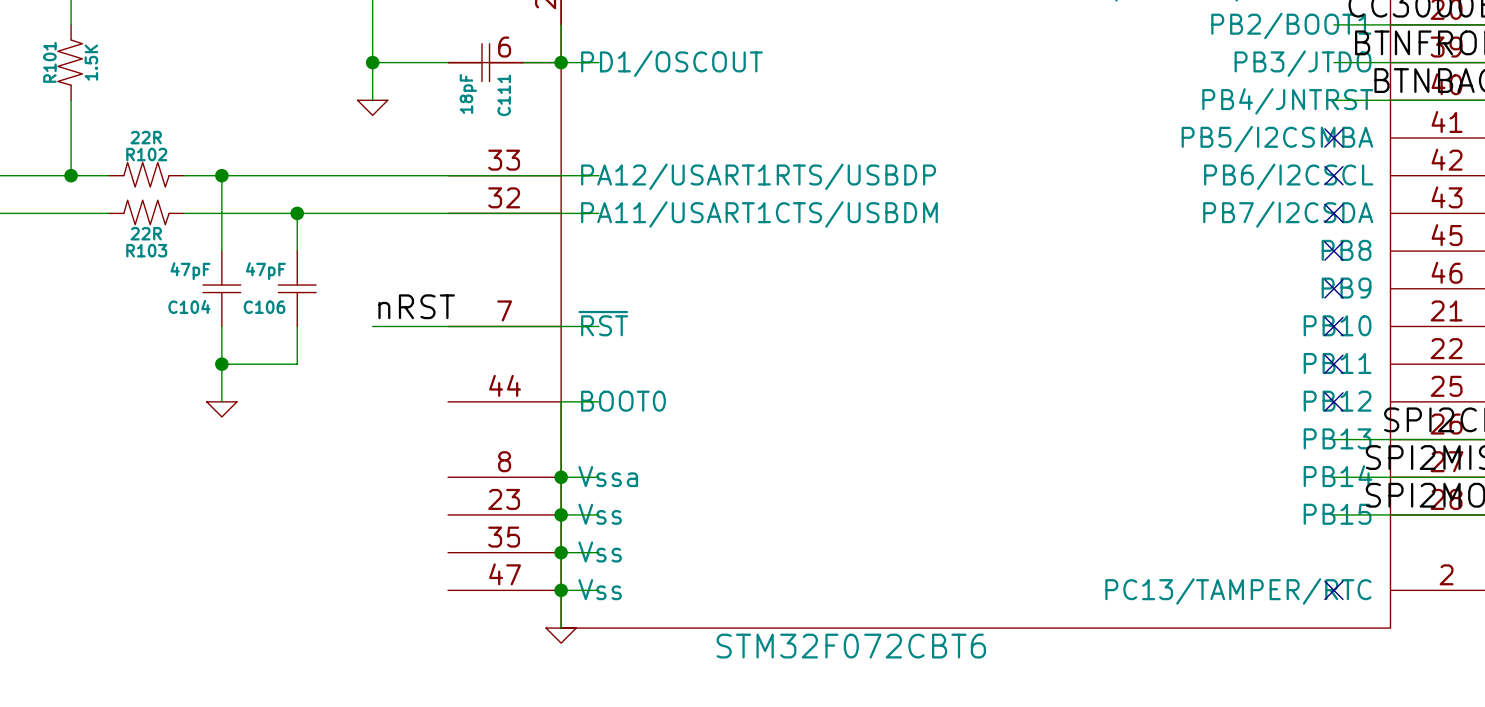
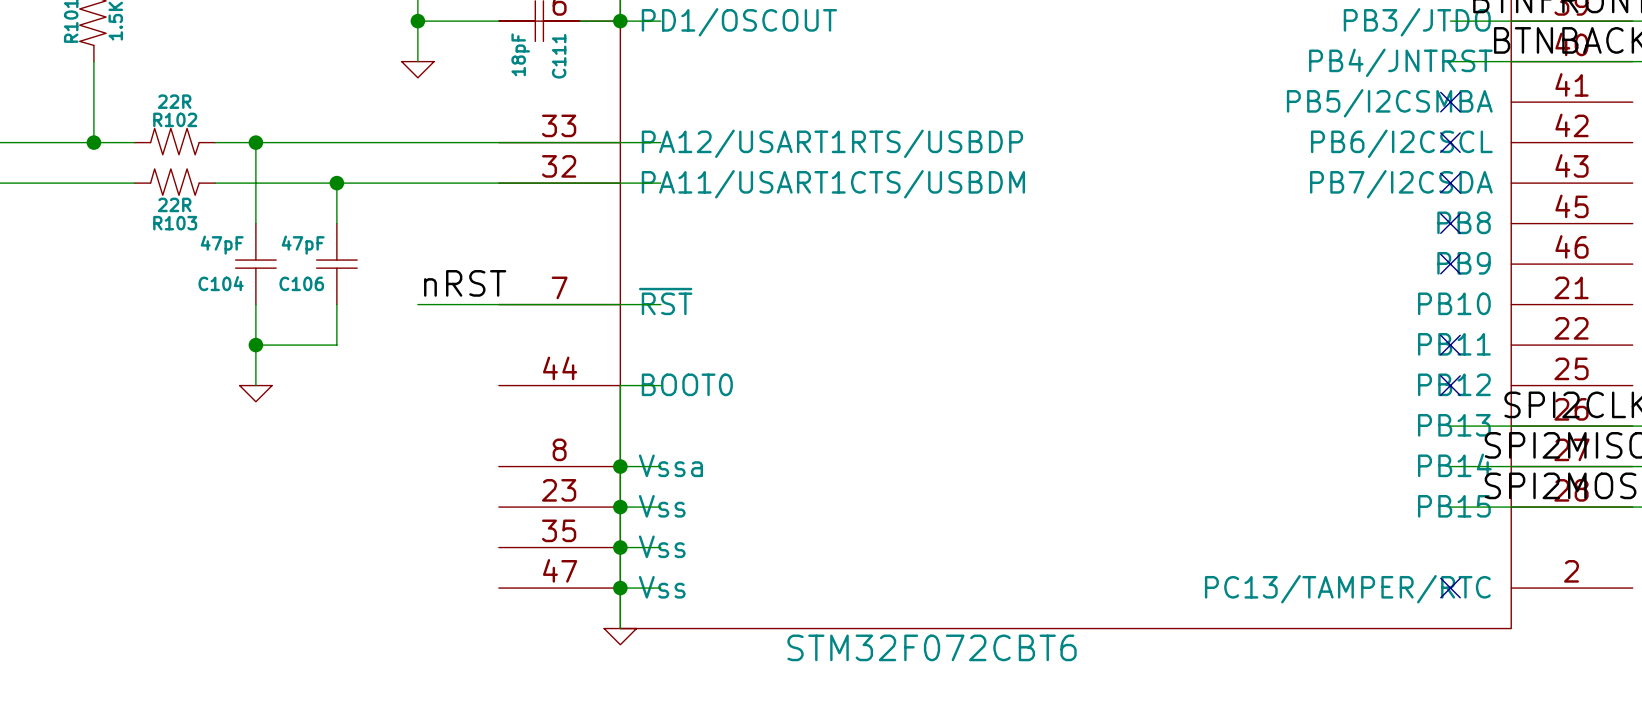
no-connect mark: (1333, 326) -> none

